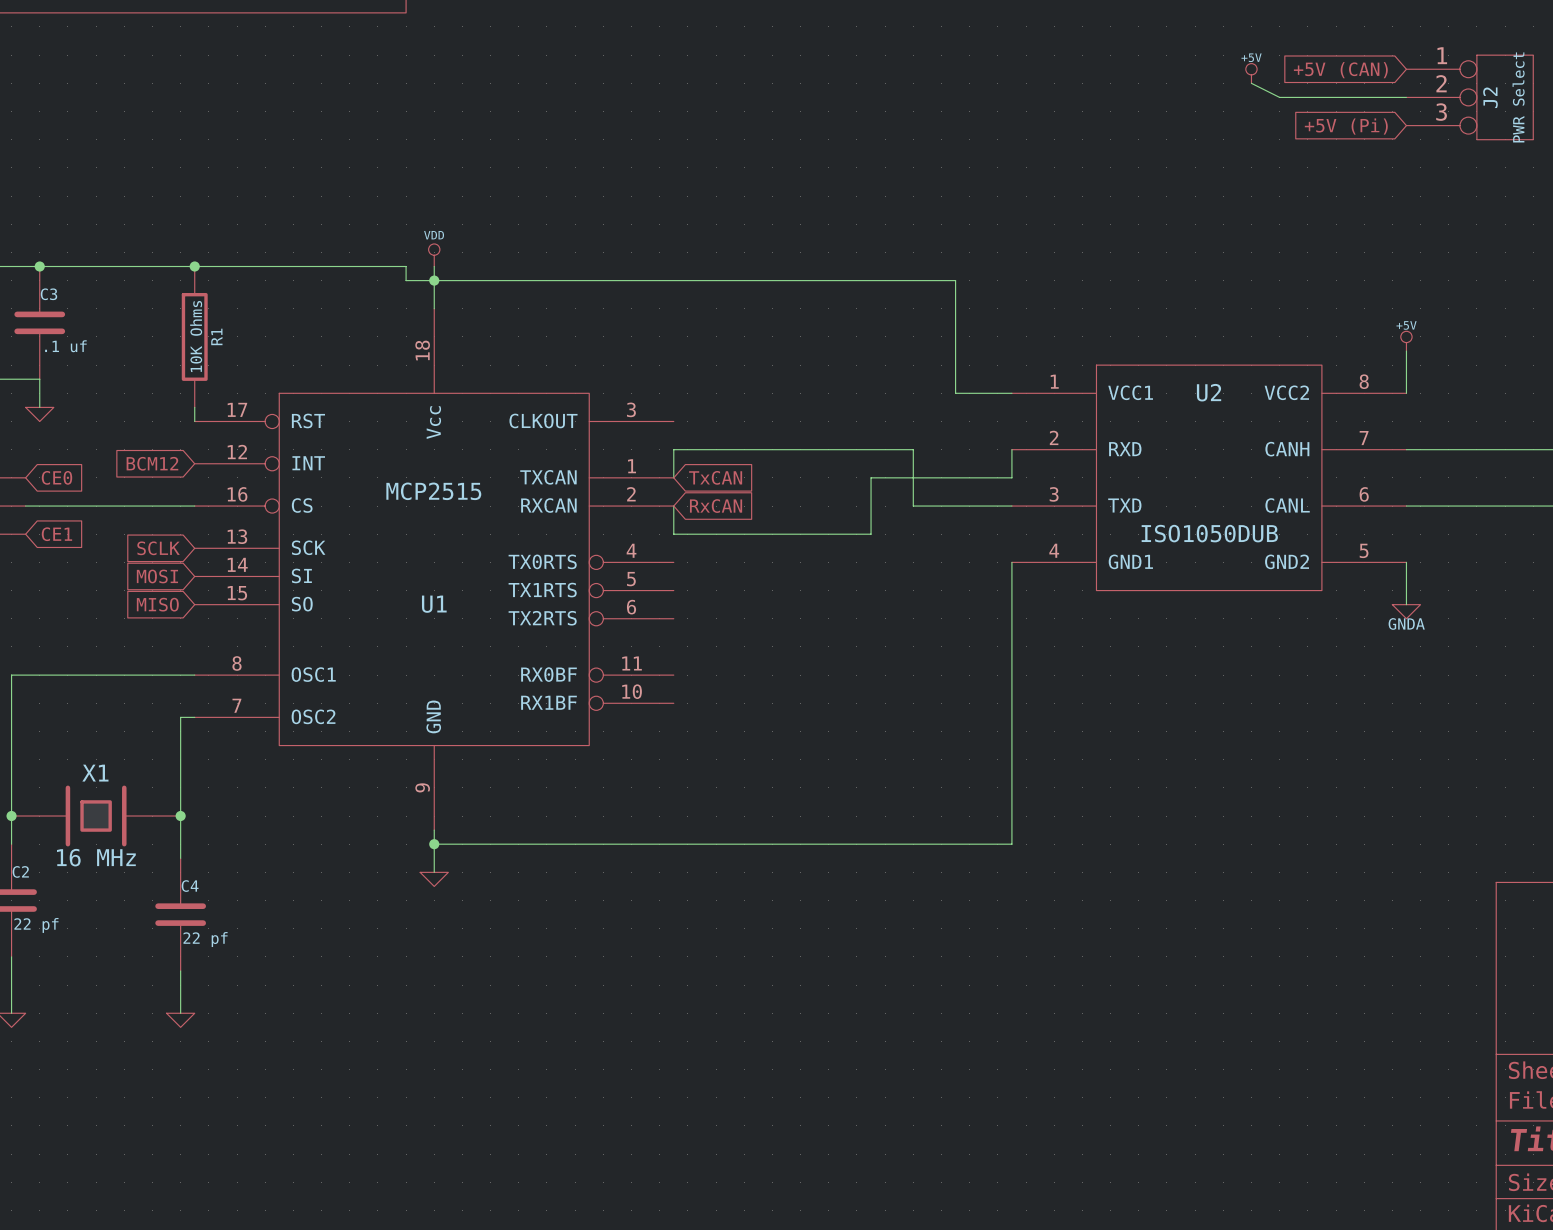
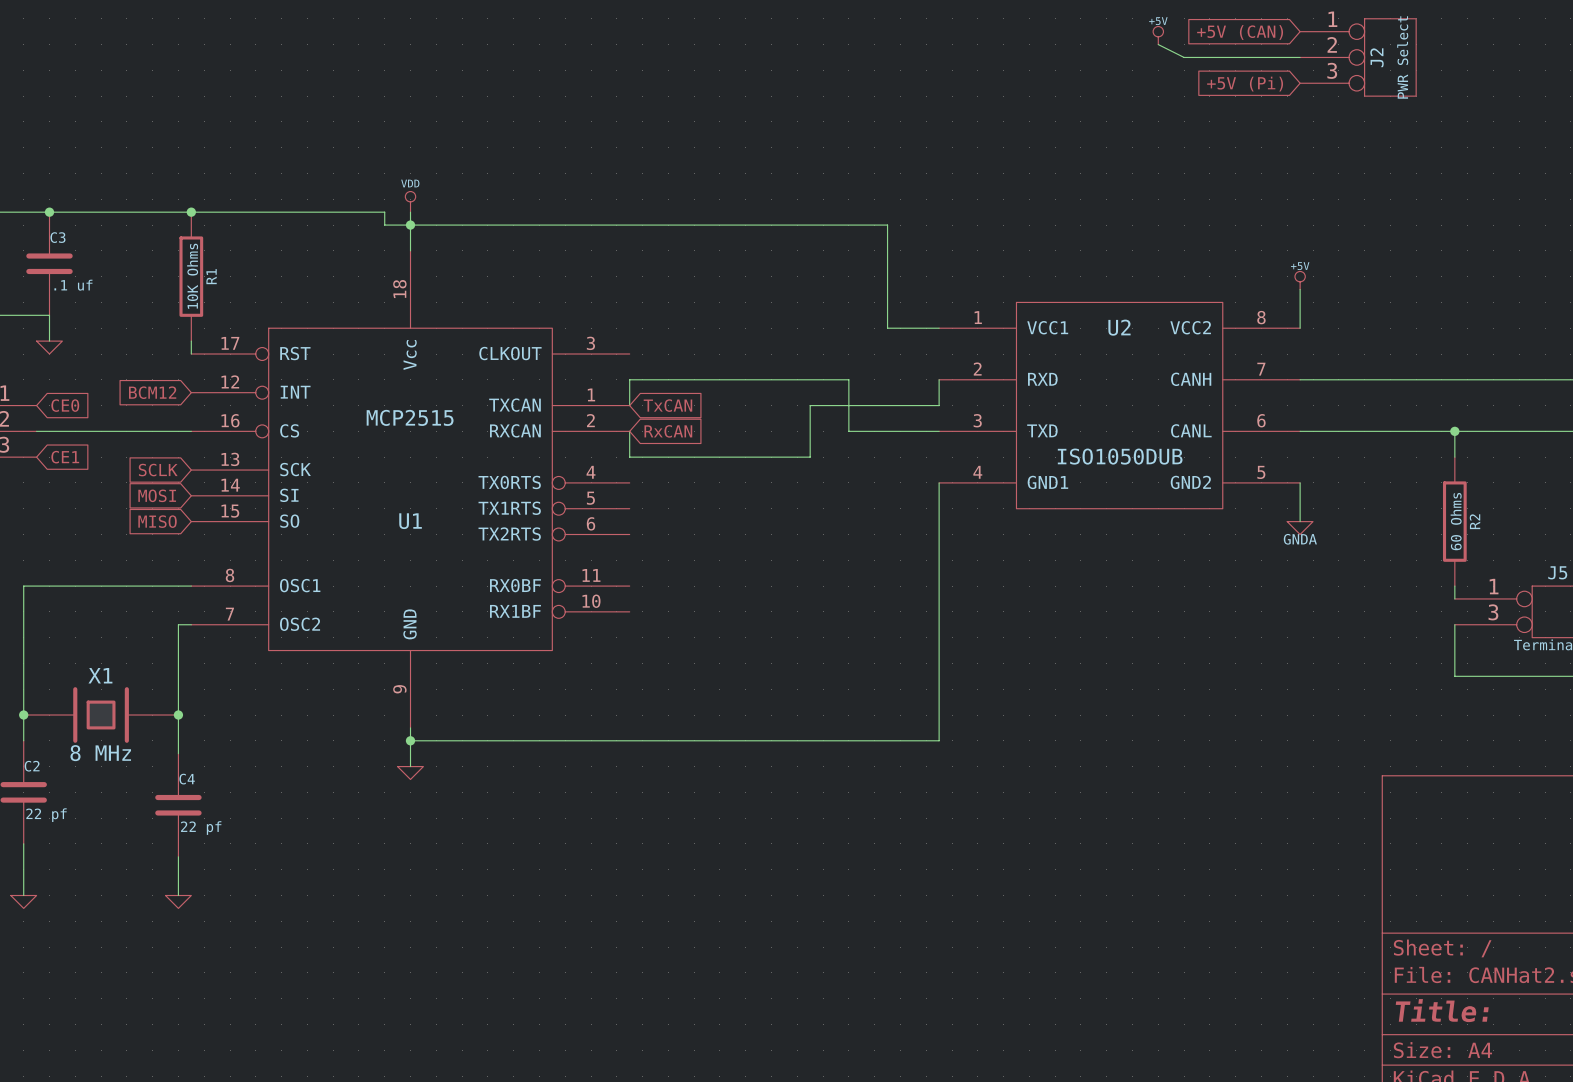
X1 value: 16 MHz (96, 857) -> 8 MHz (100, 753)

